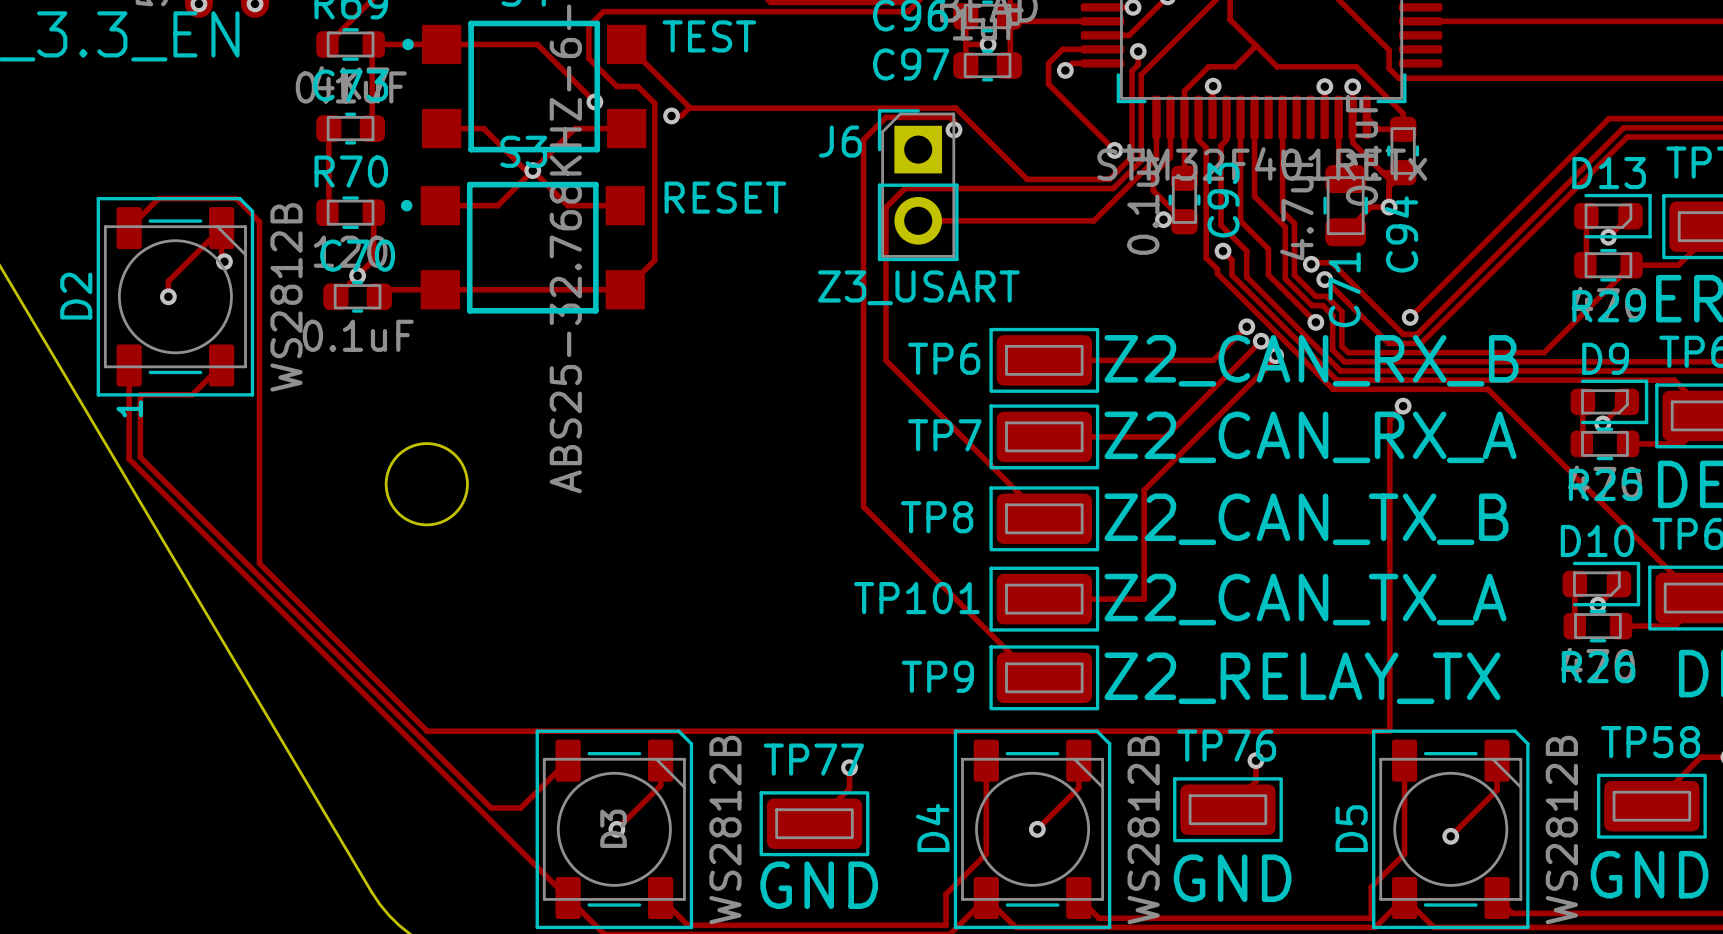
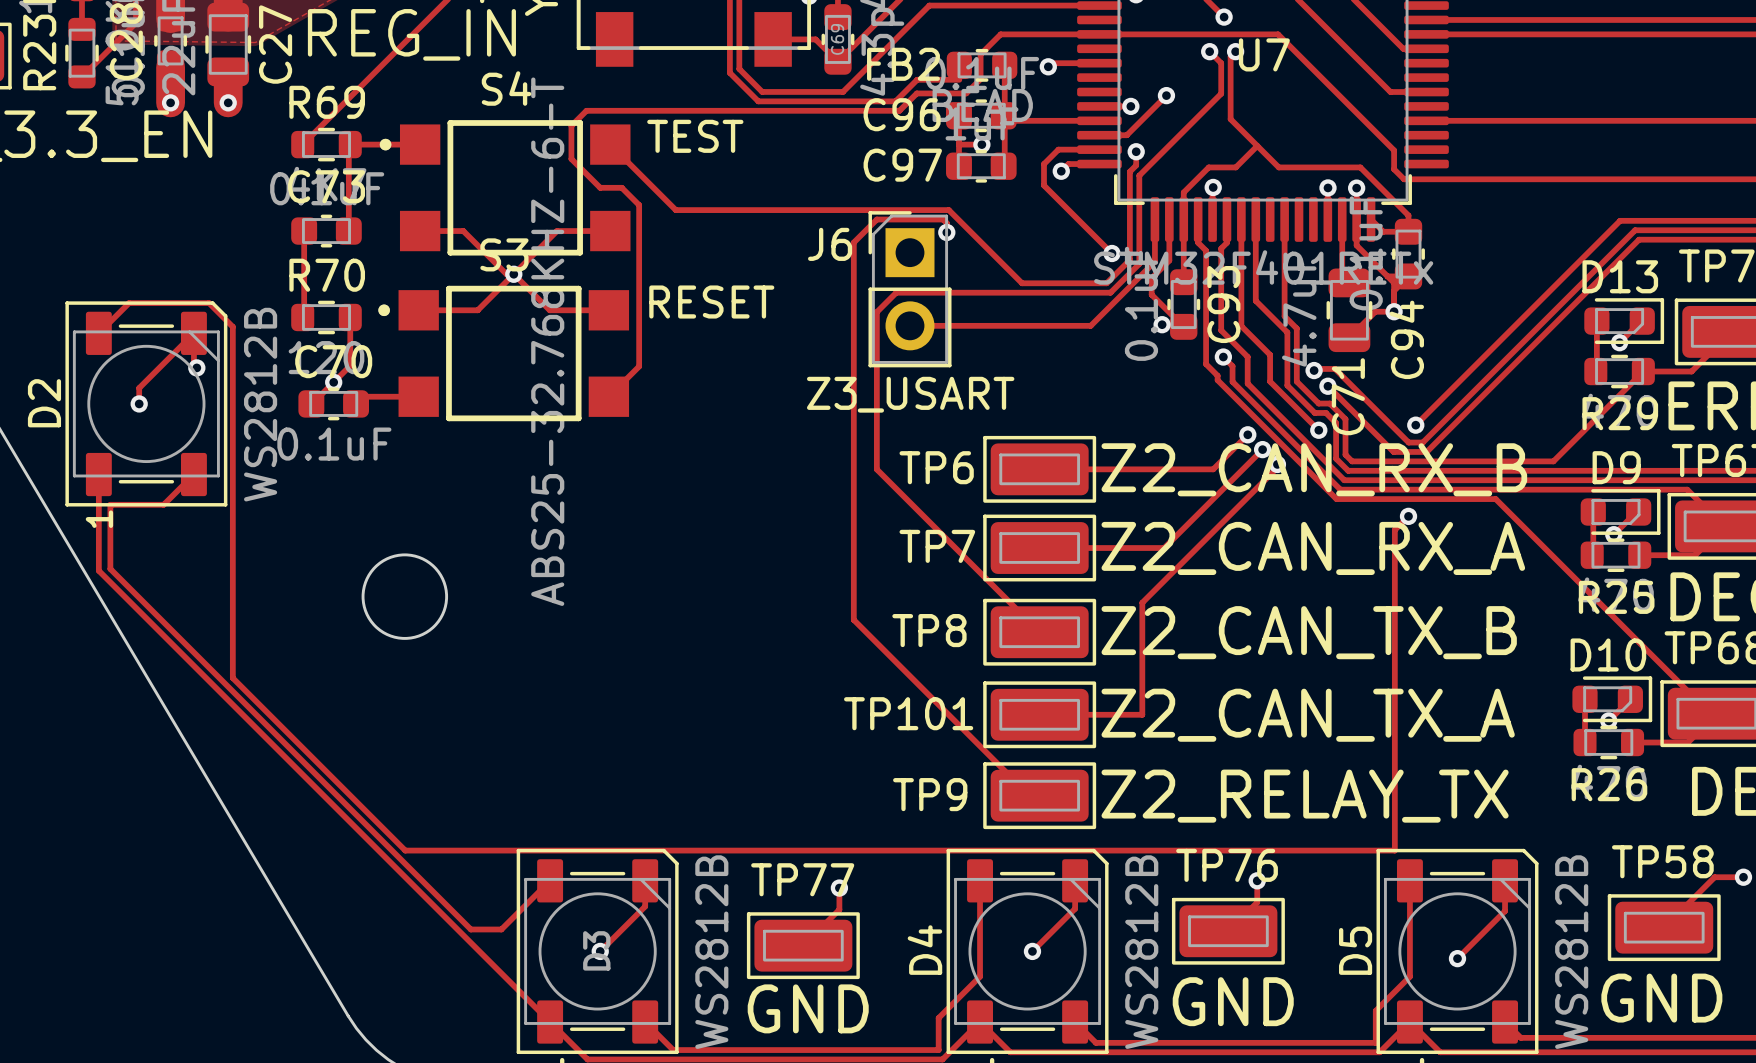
track: (441, 44) (537, 44) (594, 102) -> none
via: (594, 102) -> none
track: (689, 107) (681, 115) (671, 115) -> none
via: (671, 115) -> none
track: (440, 289) (625, 289) -> none

